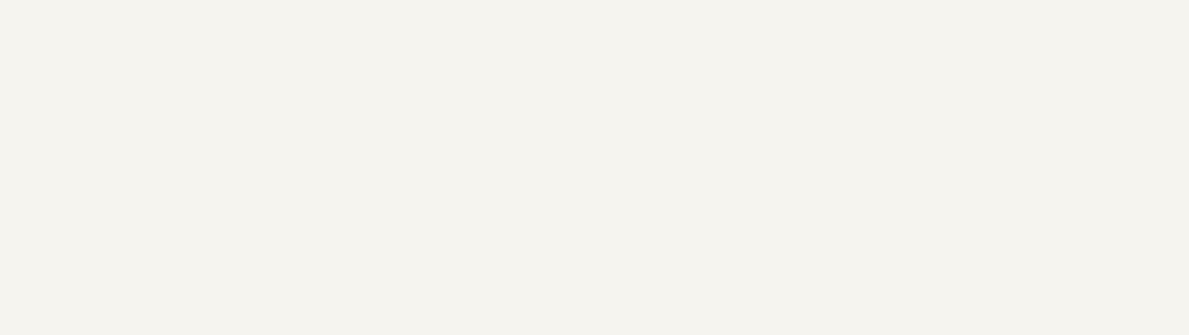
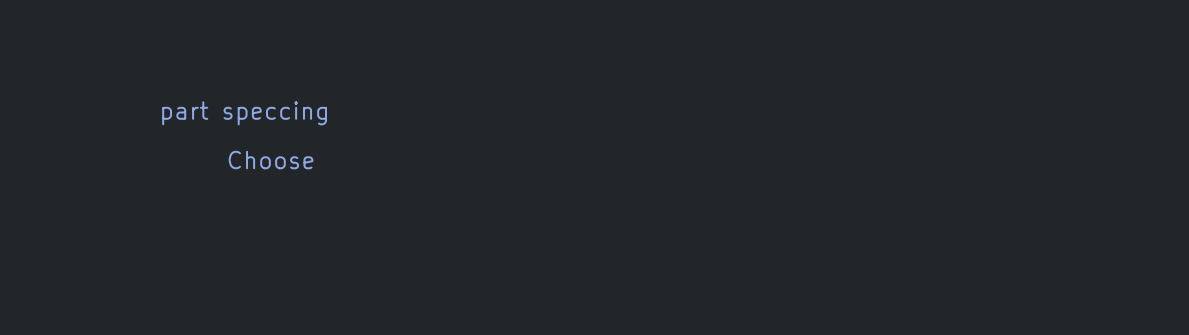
text: none -> part speccing (244, 113)
text: none -> Choose (271, 160)

